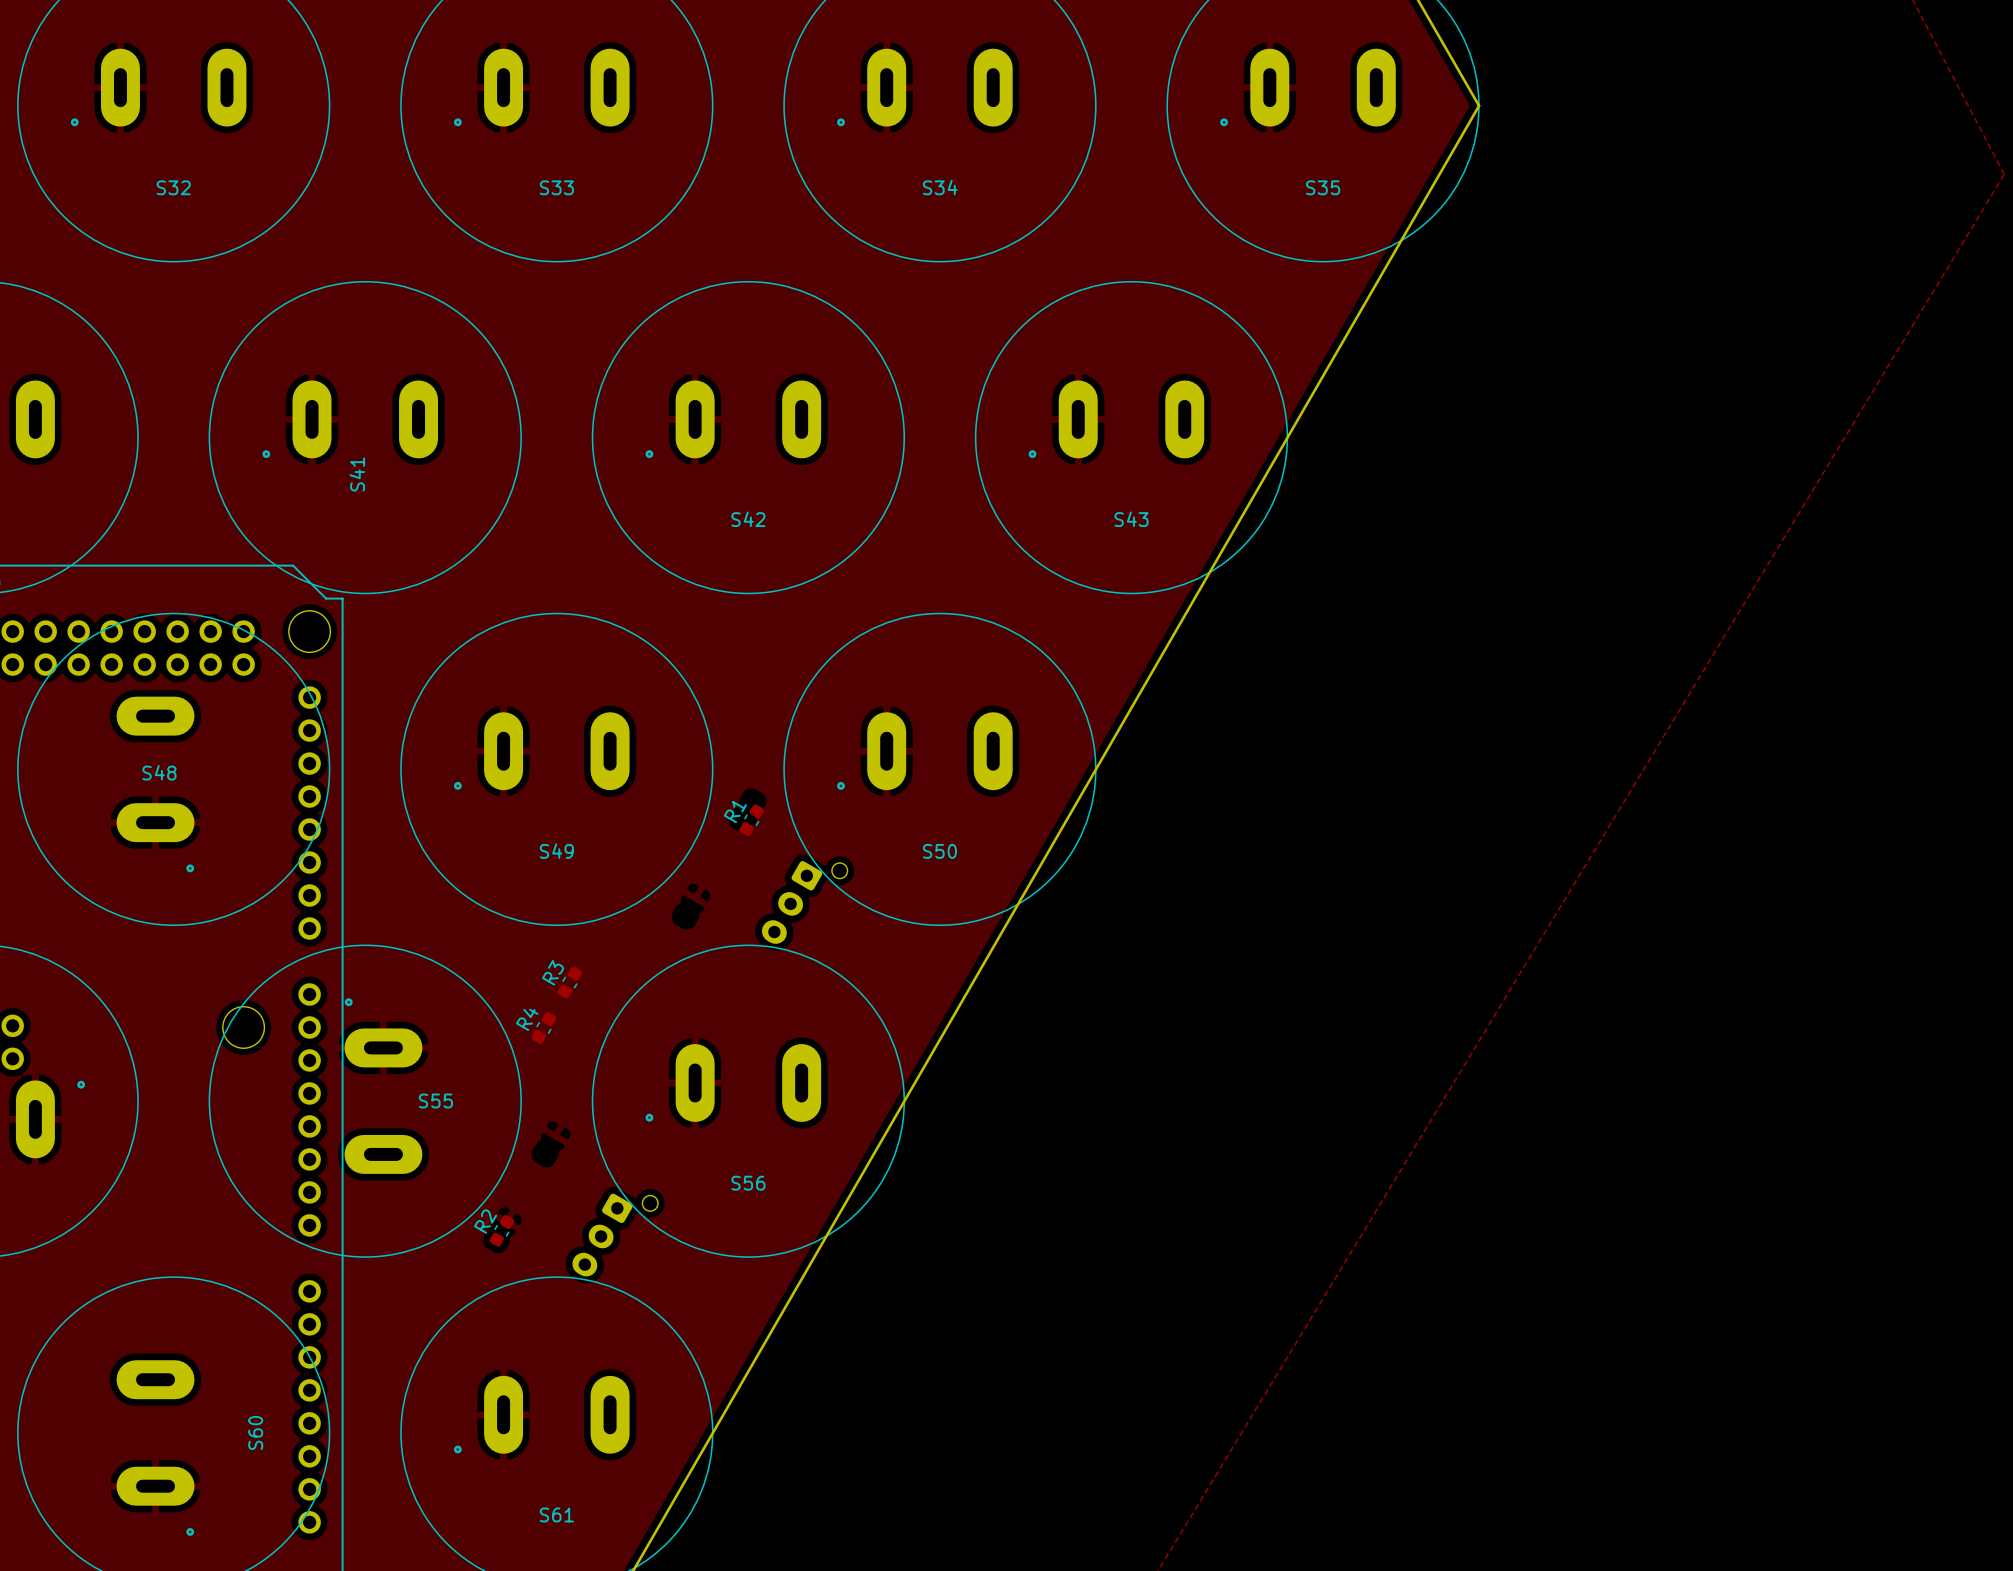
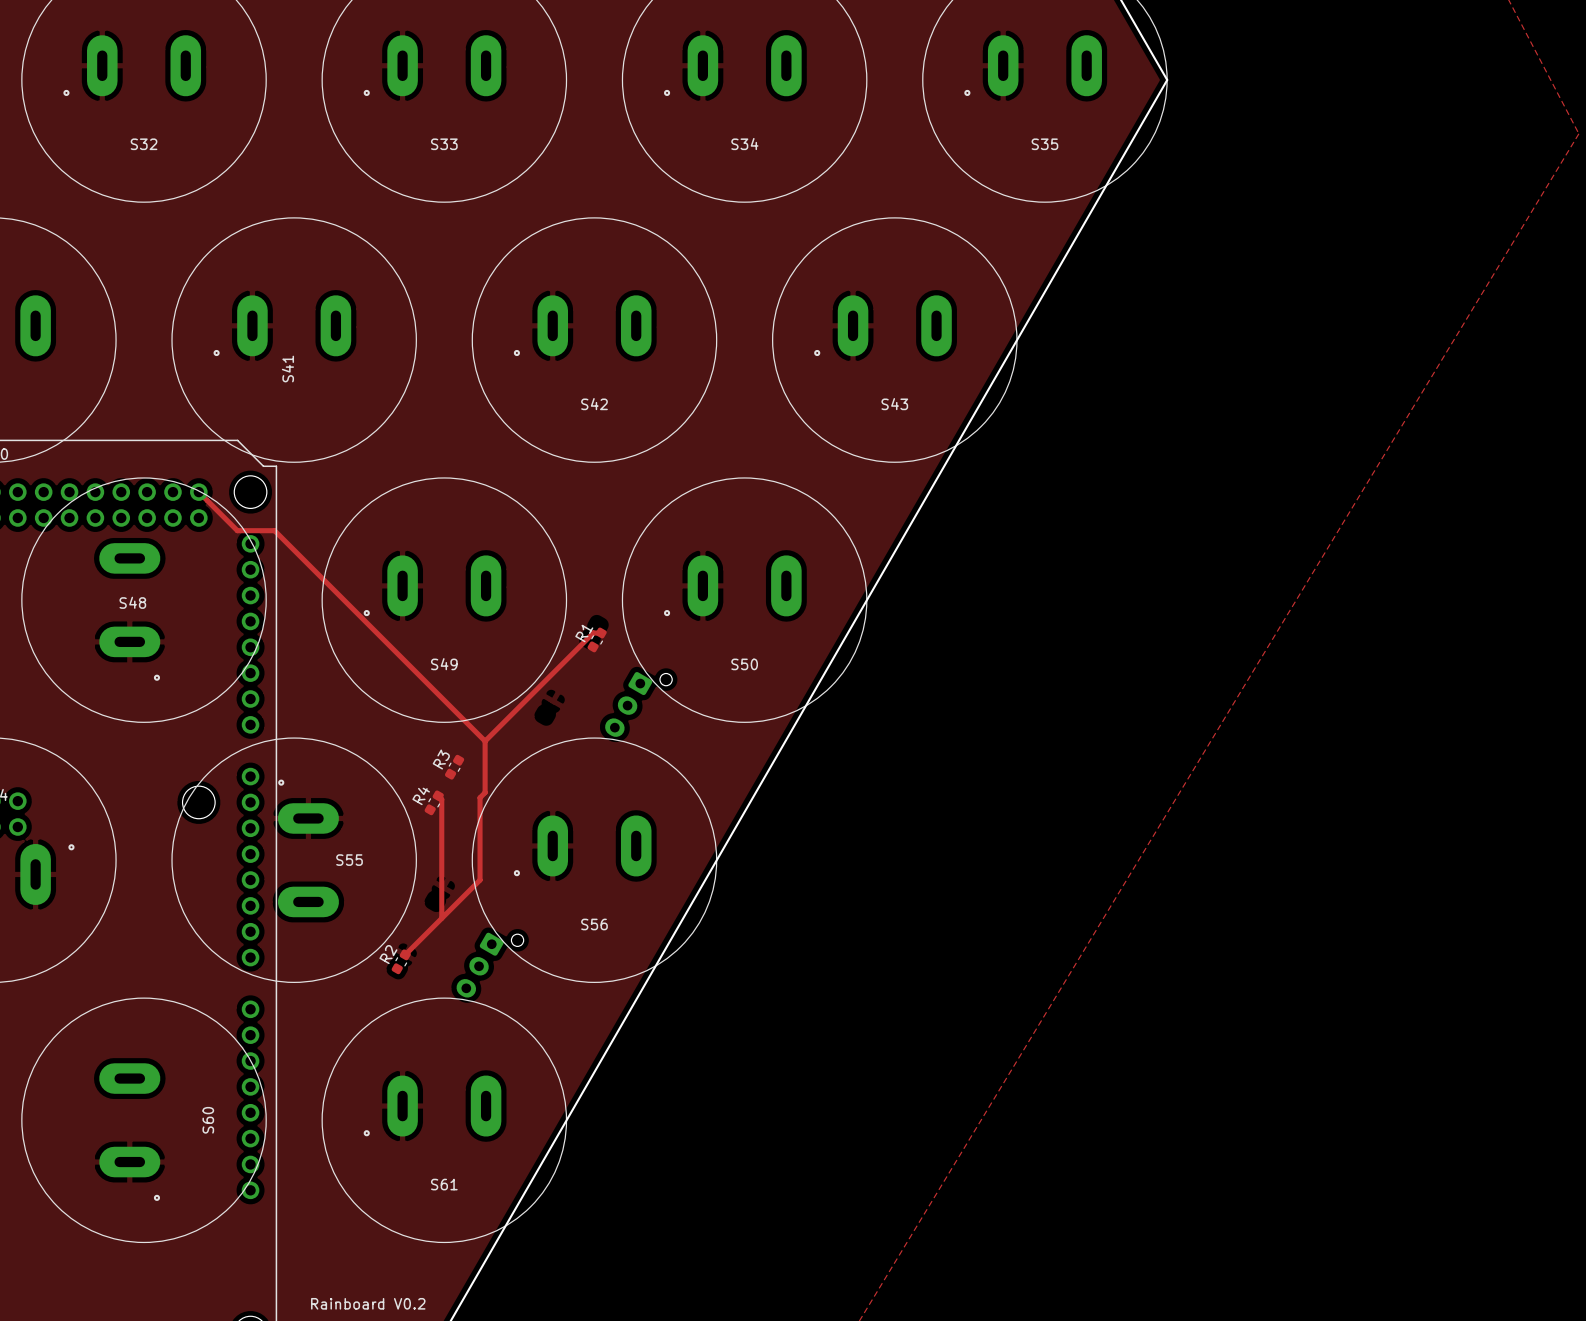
track: none -> (198, 492) (237, 530) (274, 530) (485, 741)
track: none -> (601, 633) (593, 633) (485, 741)
track: none -> (485, 741) (485, 792) (480, 797) (480, 880) (405, 954)
track: none -> (438, 795) (441, 799) (441, 918)

